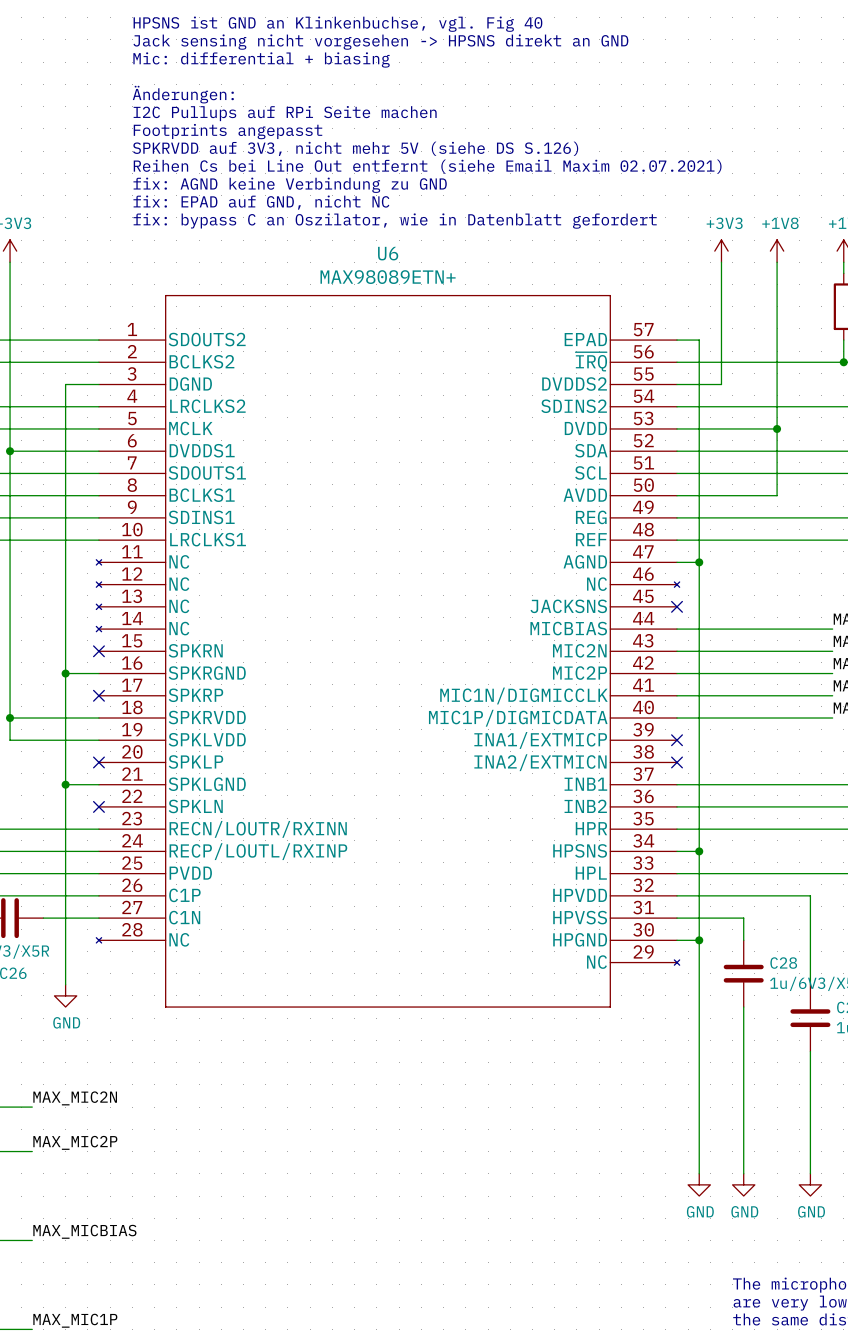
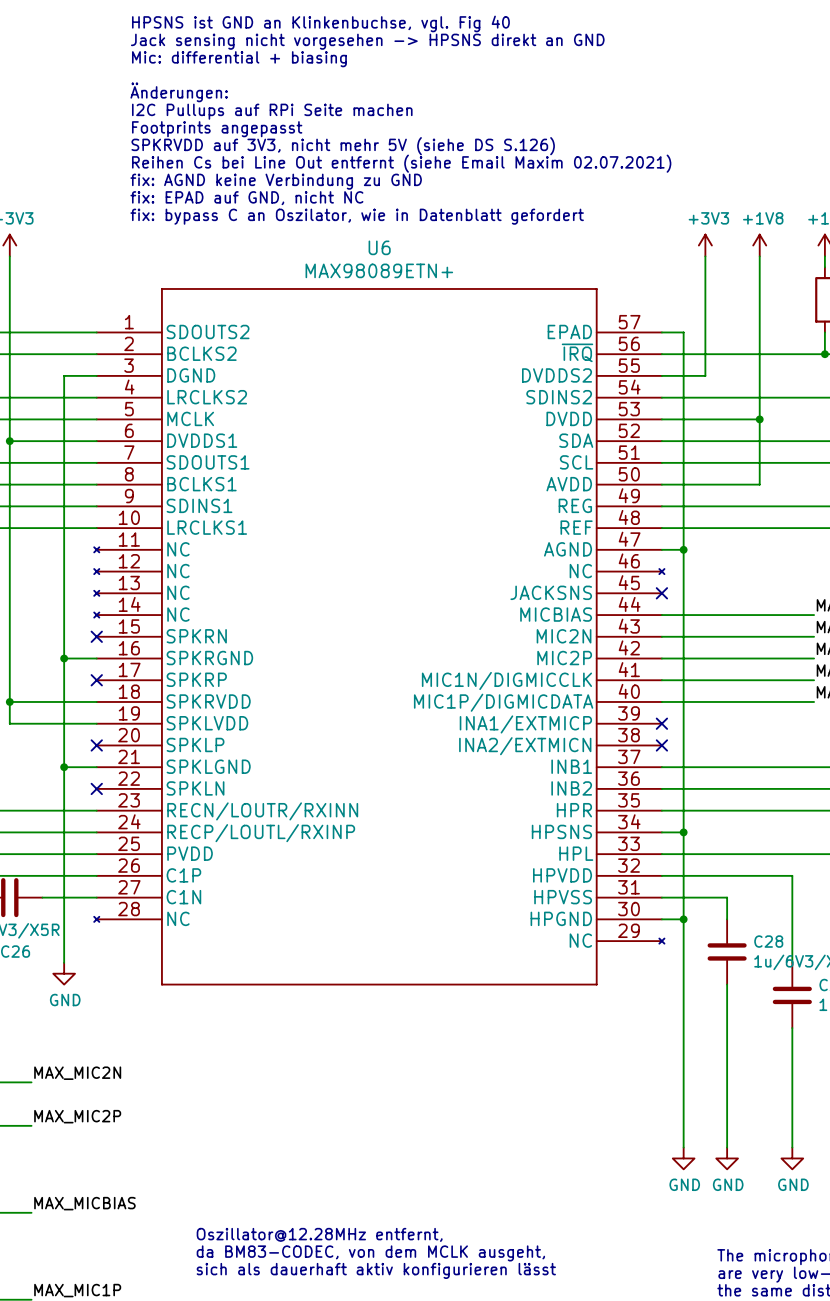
text: none -> Oszillator@12.28MHz entfernt, (319, 1234)
text: none -> da BM83-CODEC, von dem MCLK ausgeht, (370, 1253)
text: none -> sich als dauerhaft aktiv konfigurieren lässt (376, 1270)

